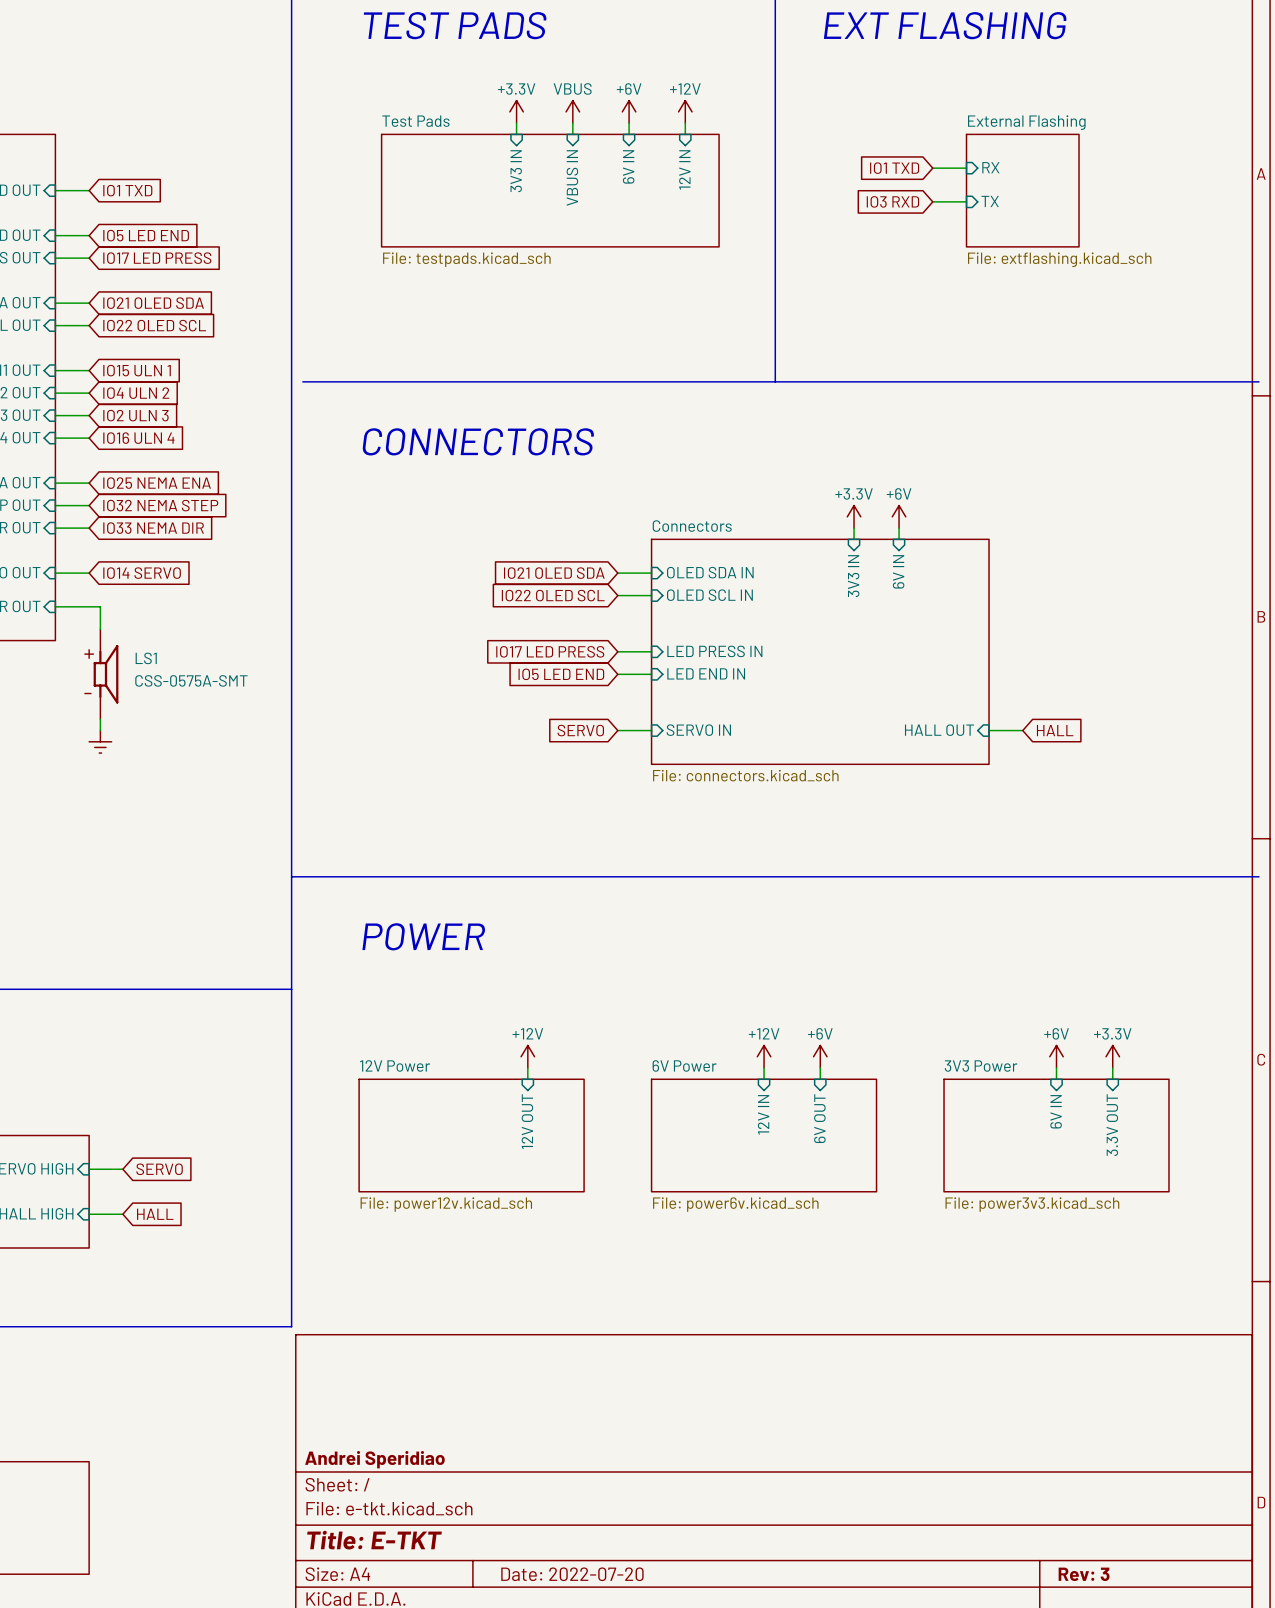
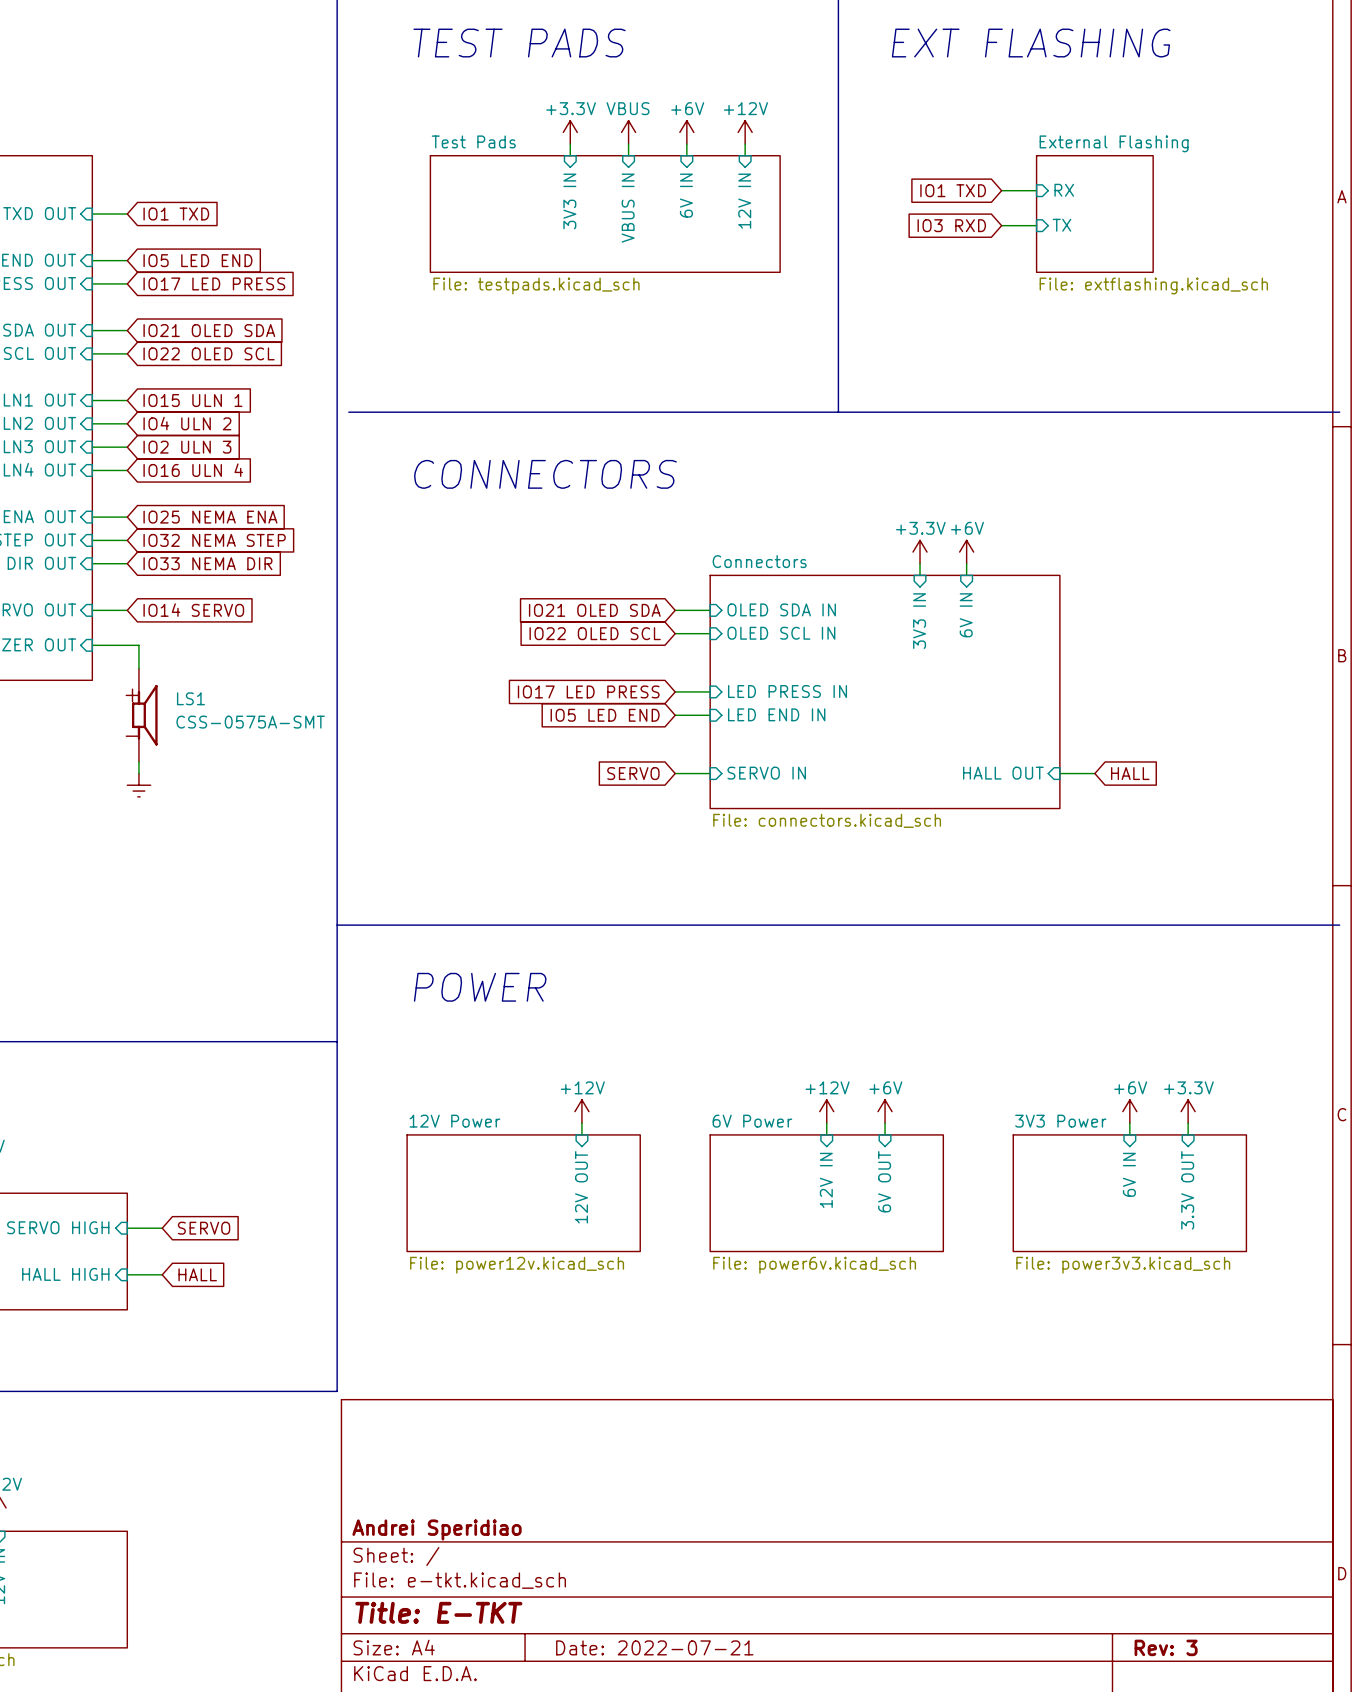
title block: Date: 2022-07-20 (572, 1574) -> Date: 2022-07-21 (654, 1647)

